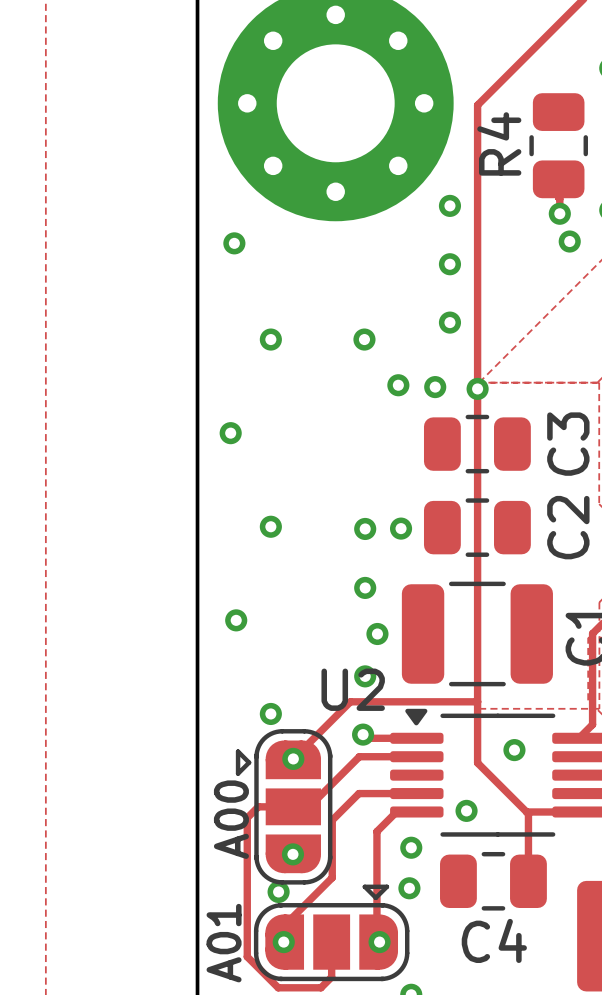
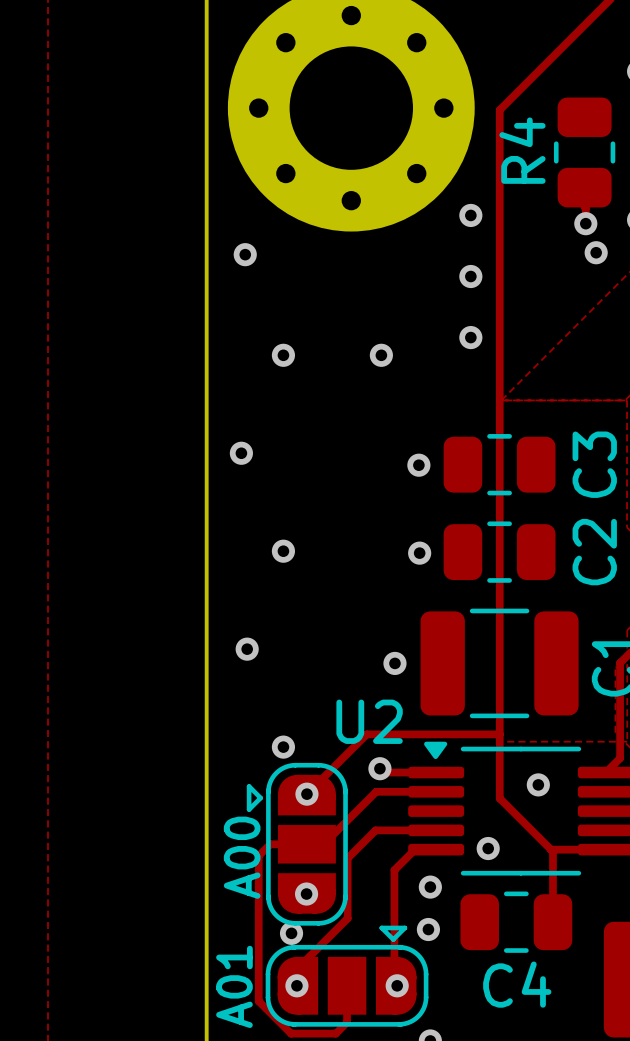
via: (398, 385) -> none
via: (435, 387) -> none
via: (477, 388) -> none
via: none -> (418, 465)
via: (365, 528) -> none
via: (365, 587) -> none
via: (365, 676) -> none

